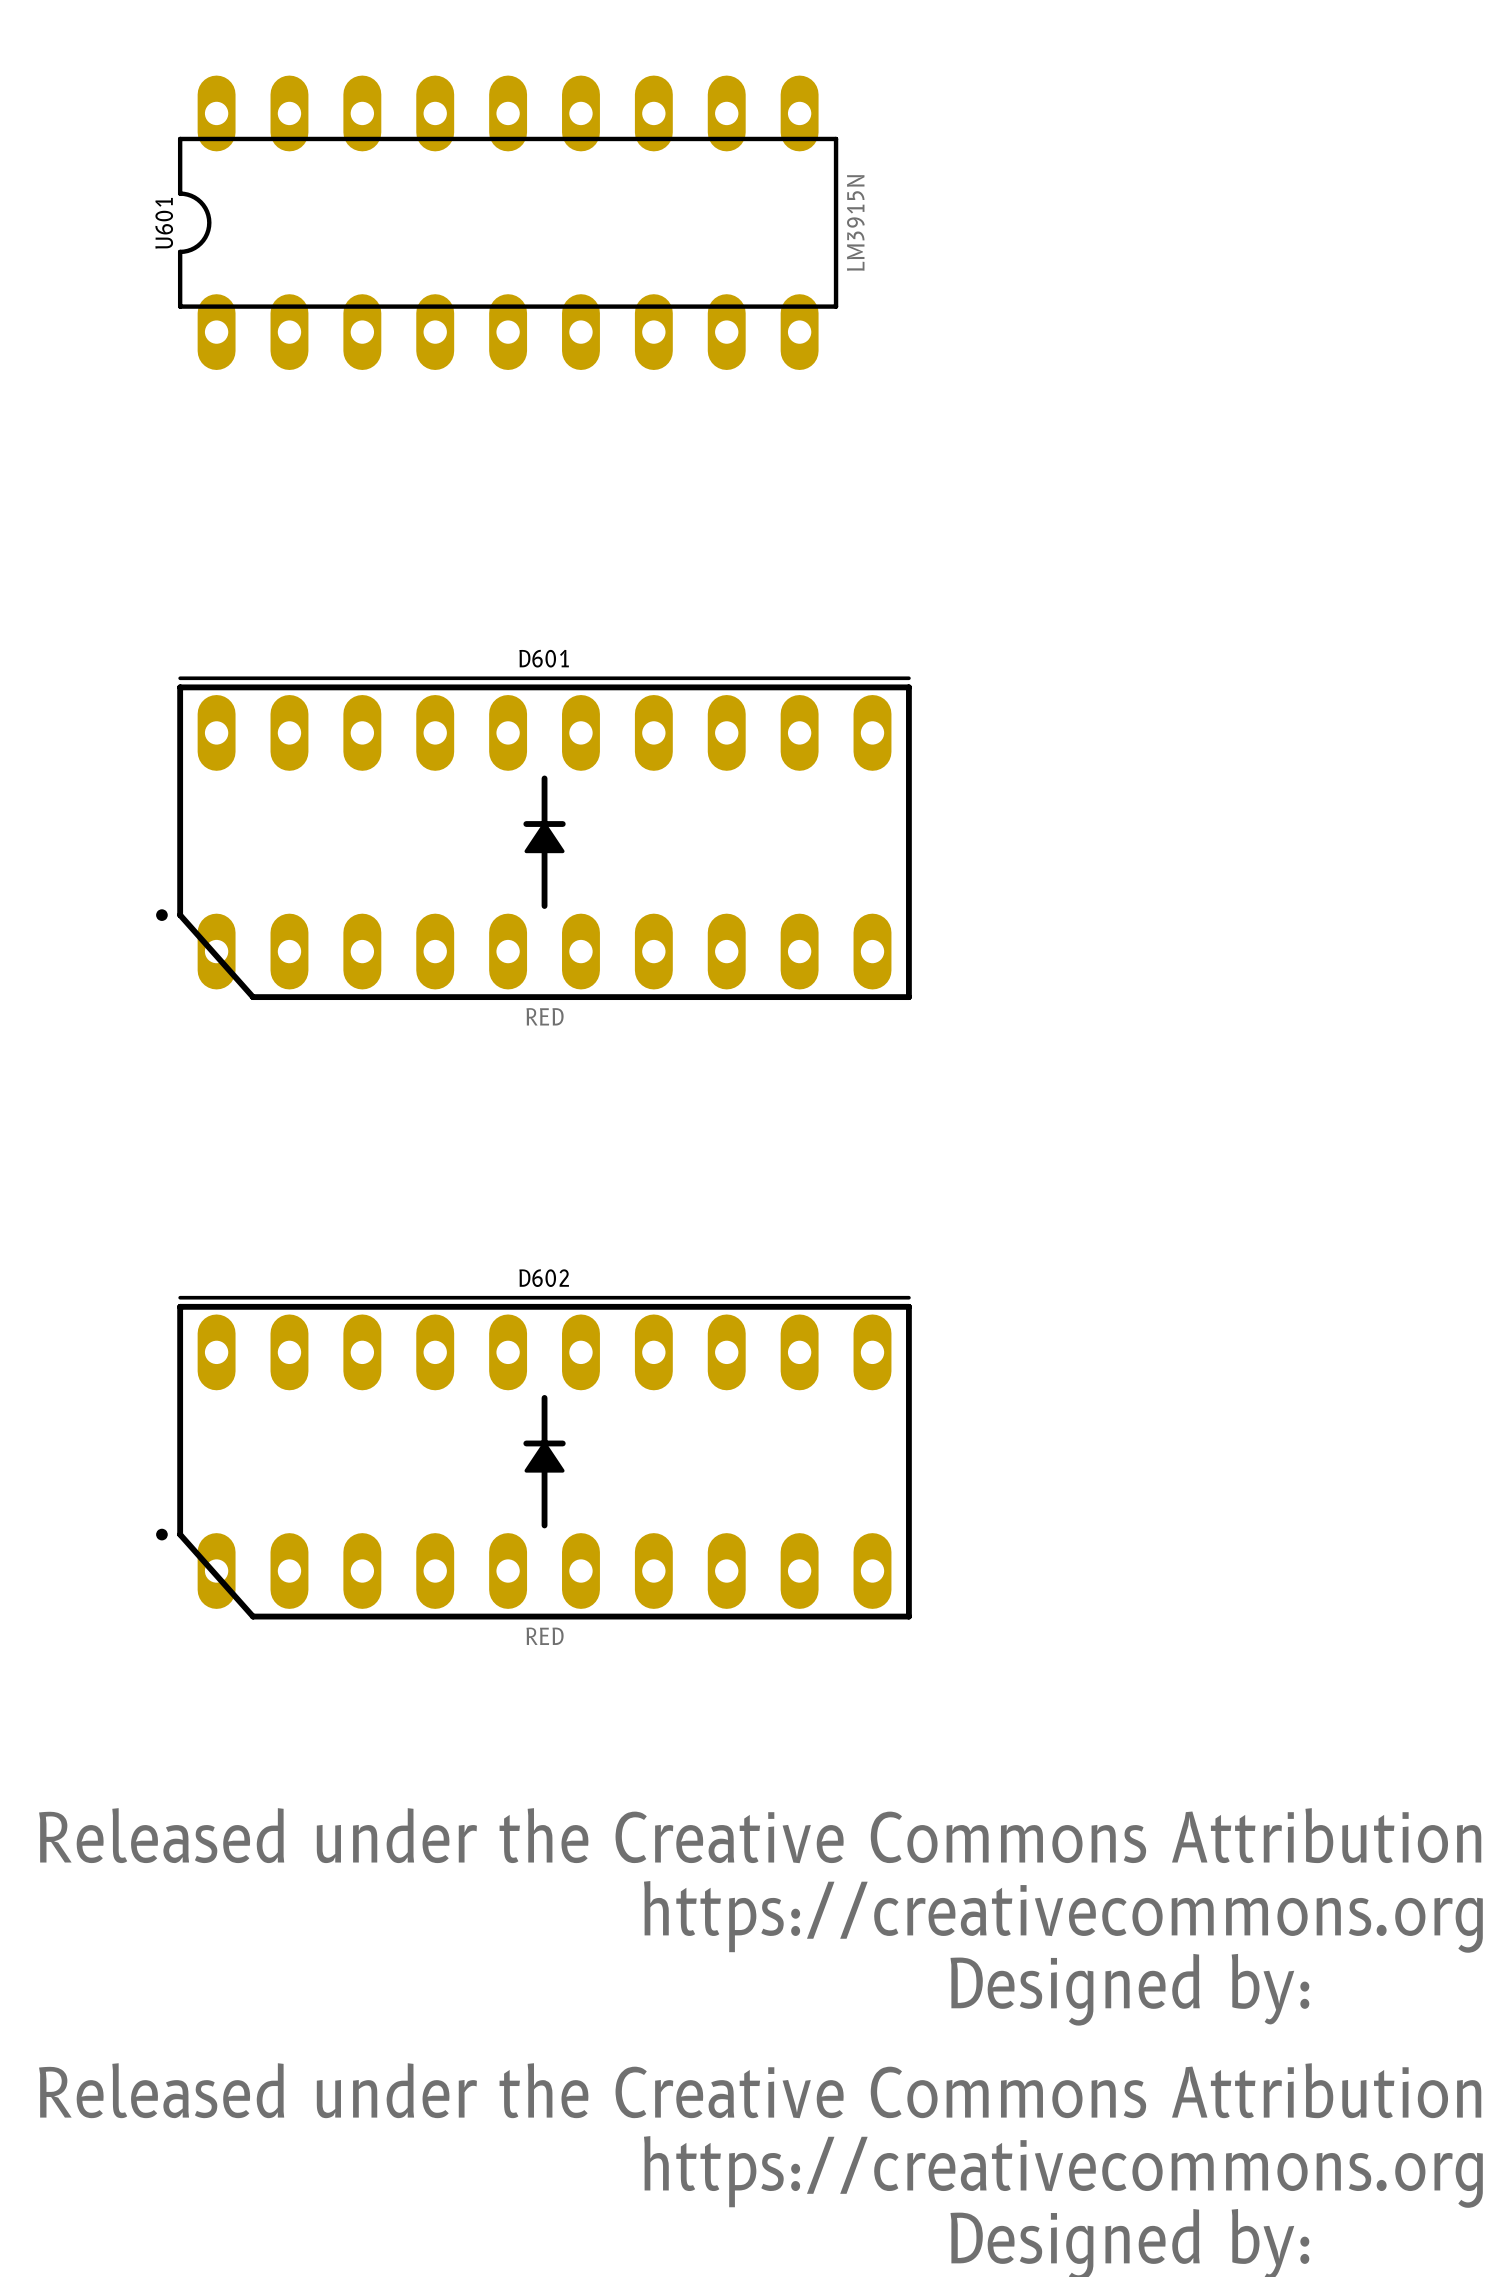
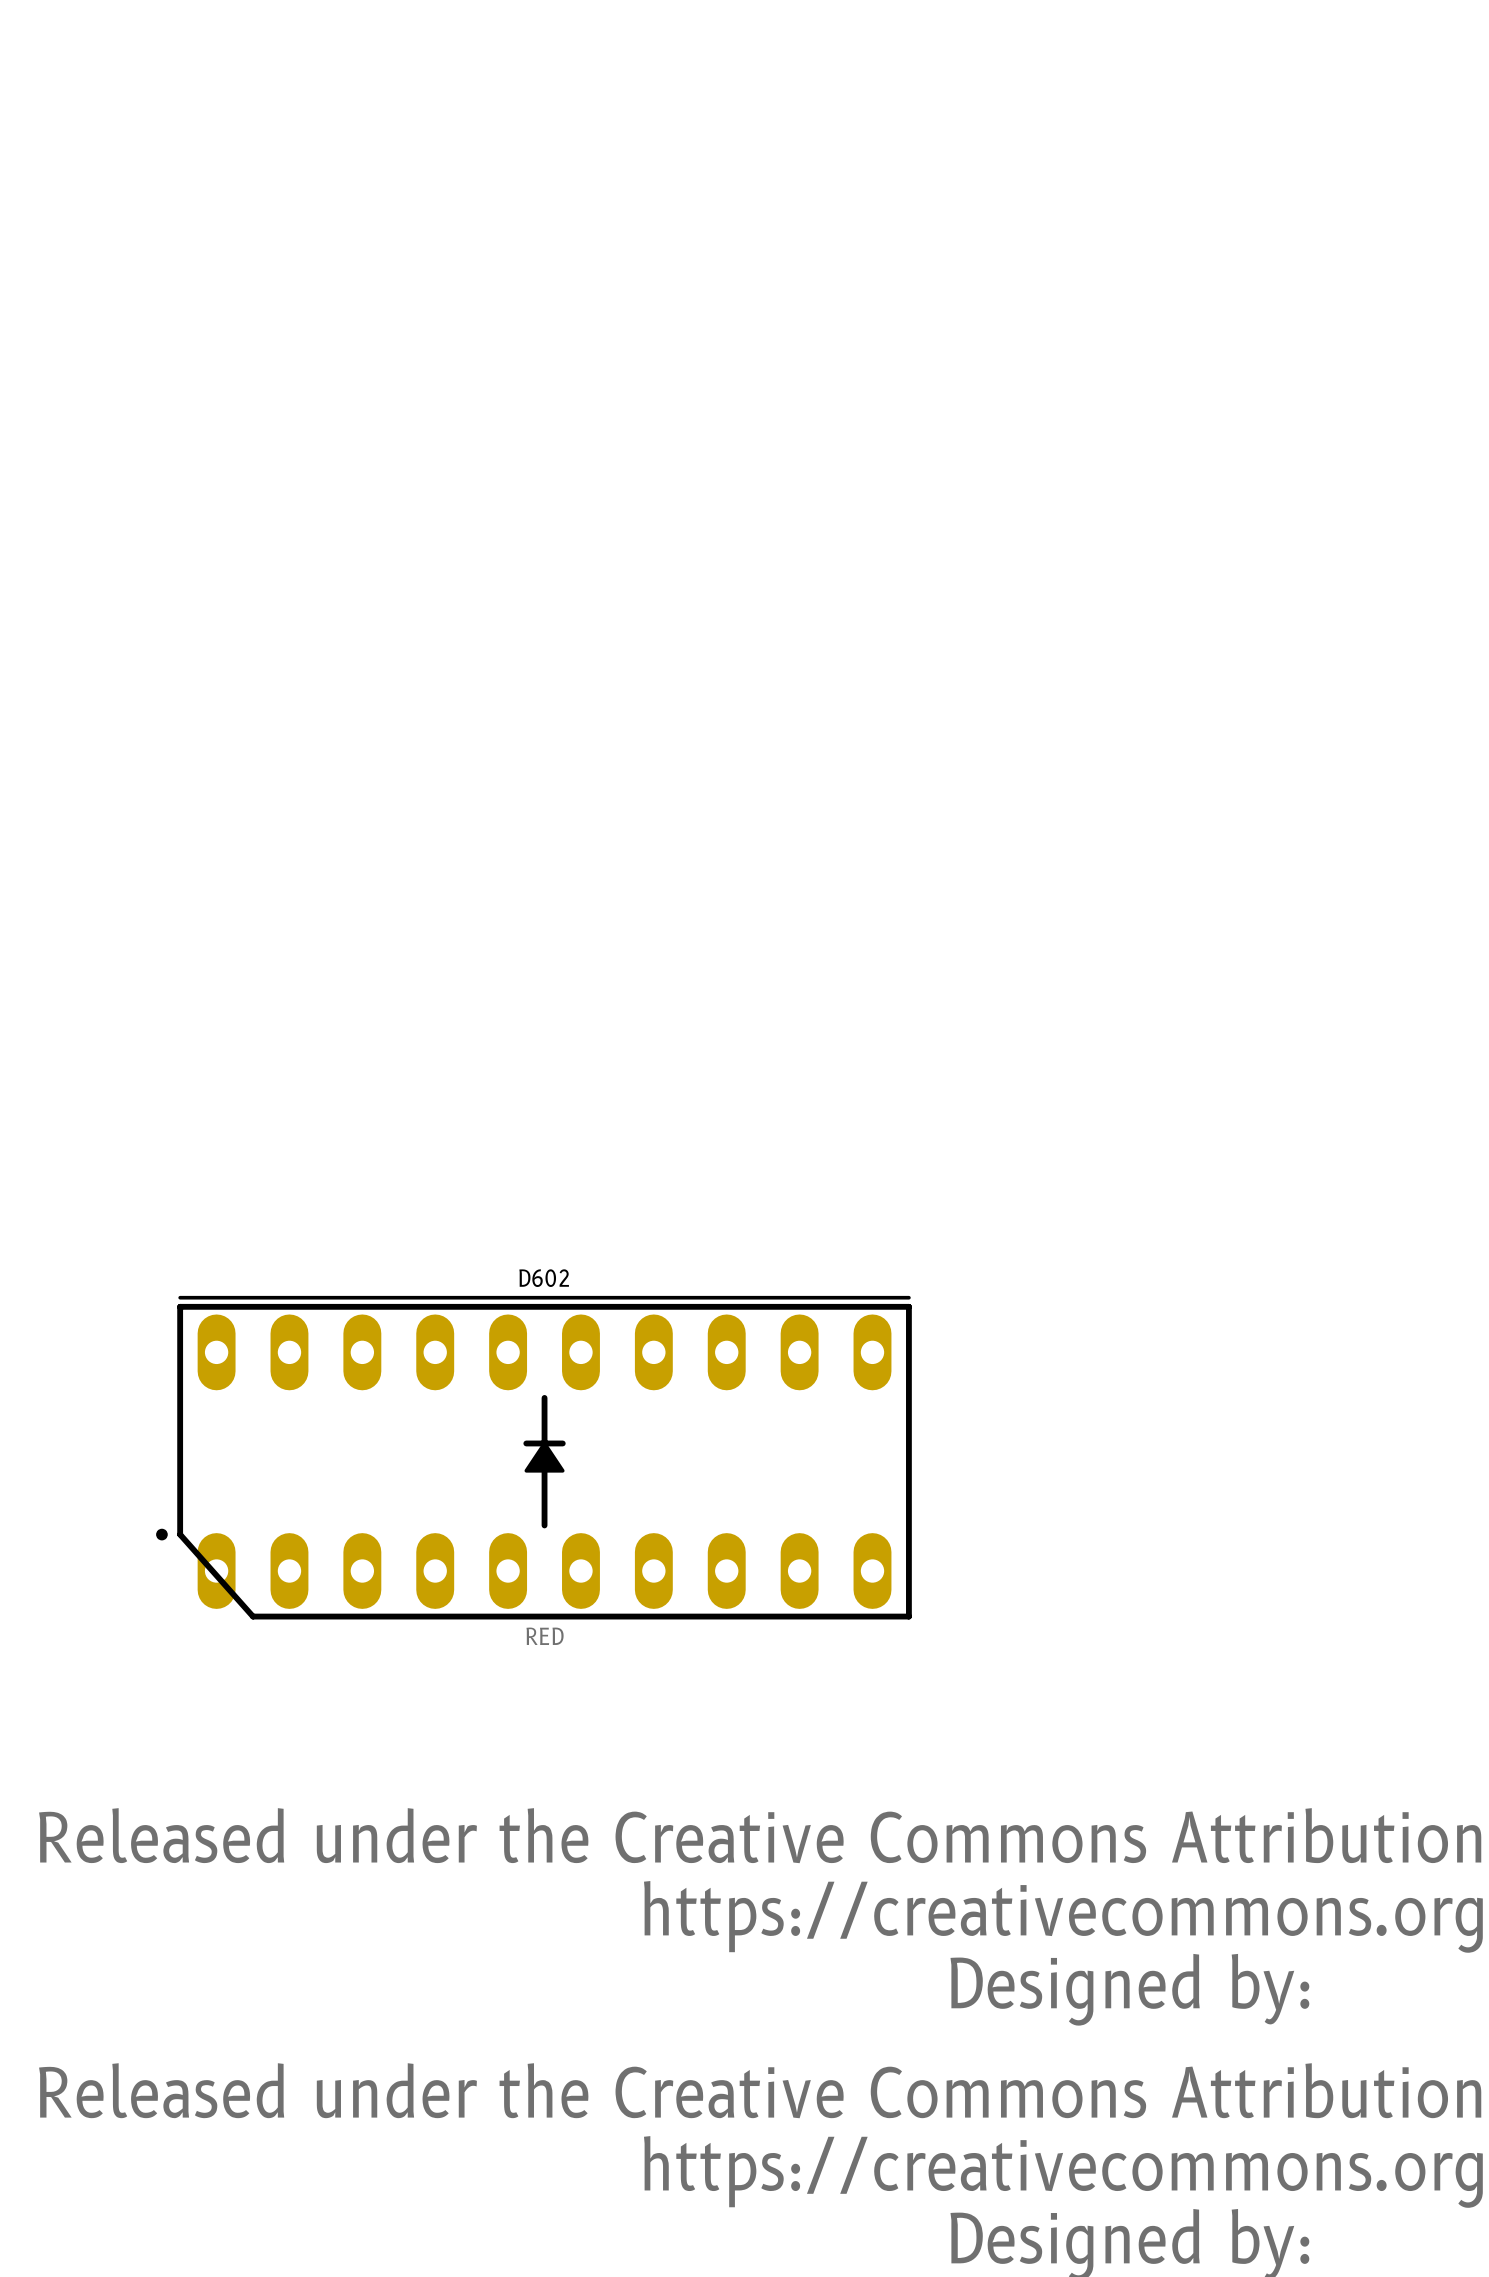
U601: LM3915N (508, 222) -> none
D601: RED (533, 838) -> none

